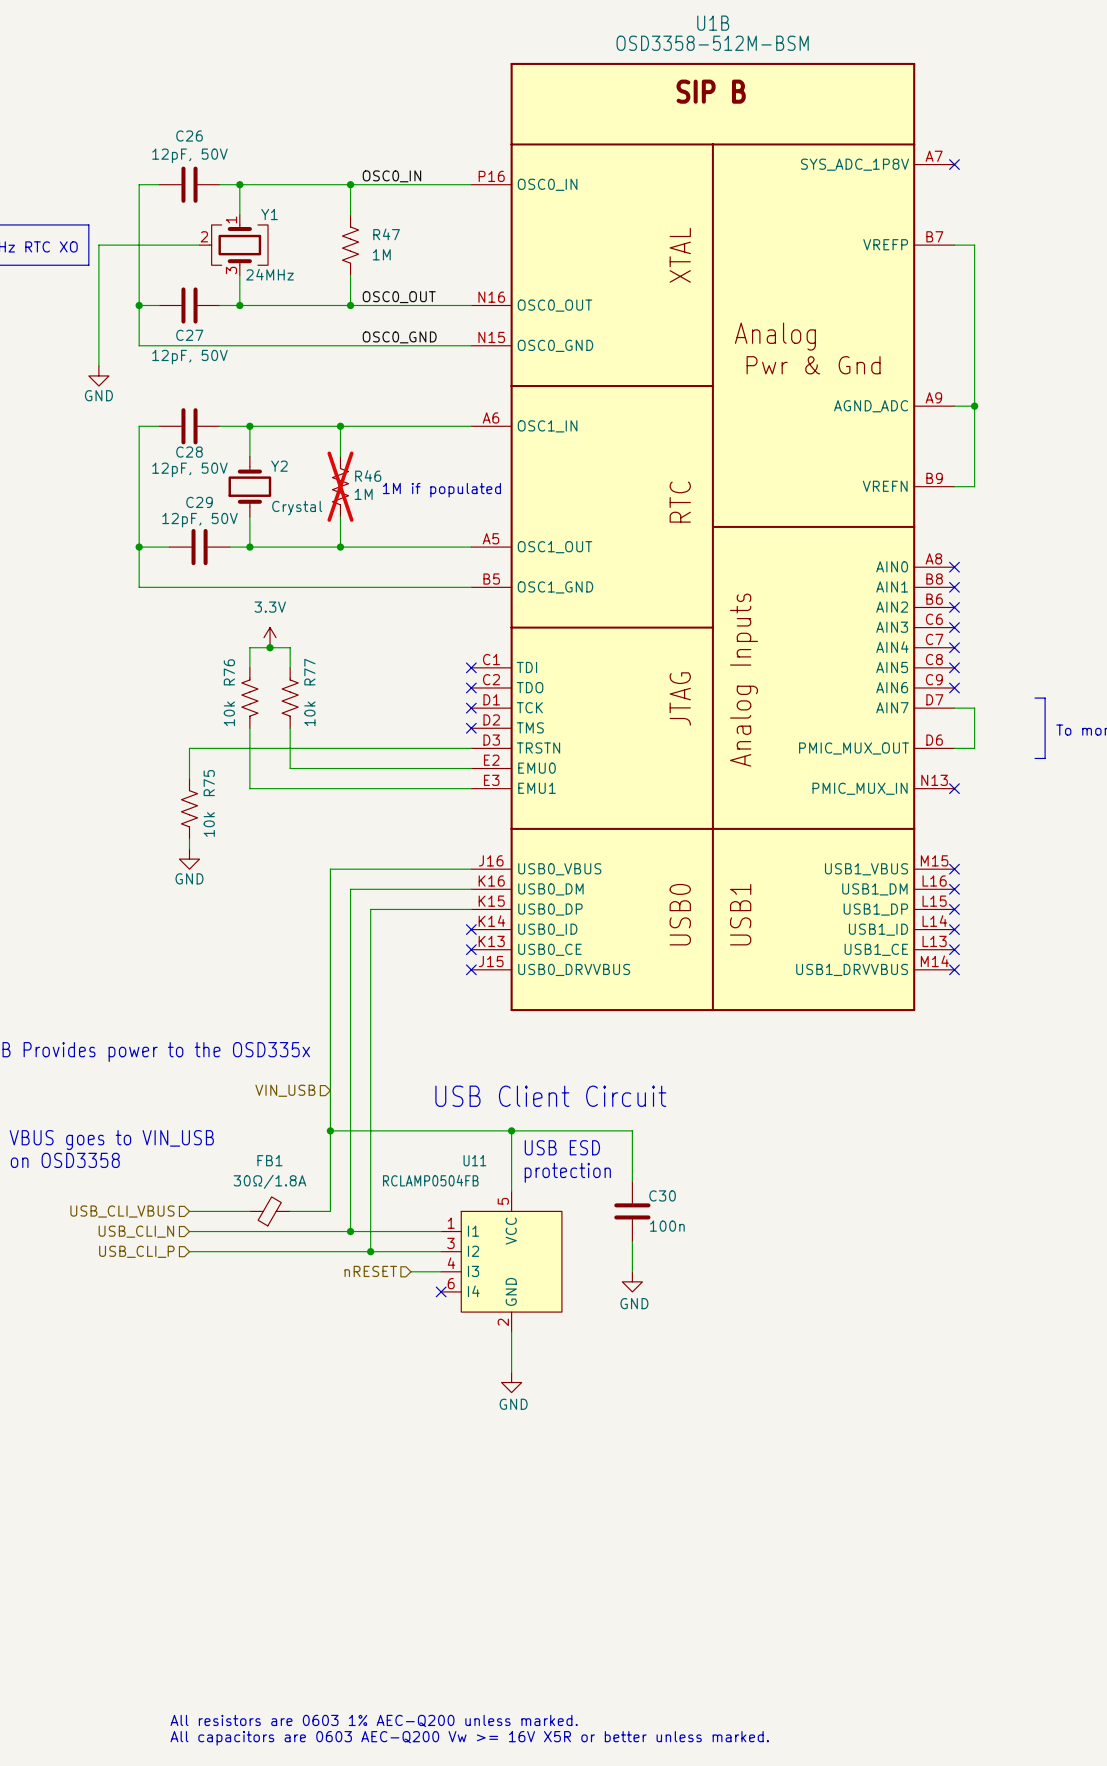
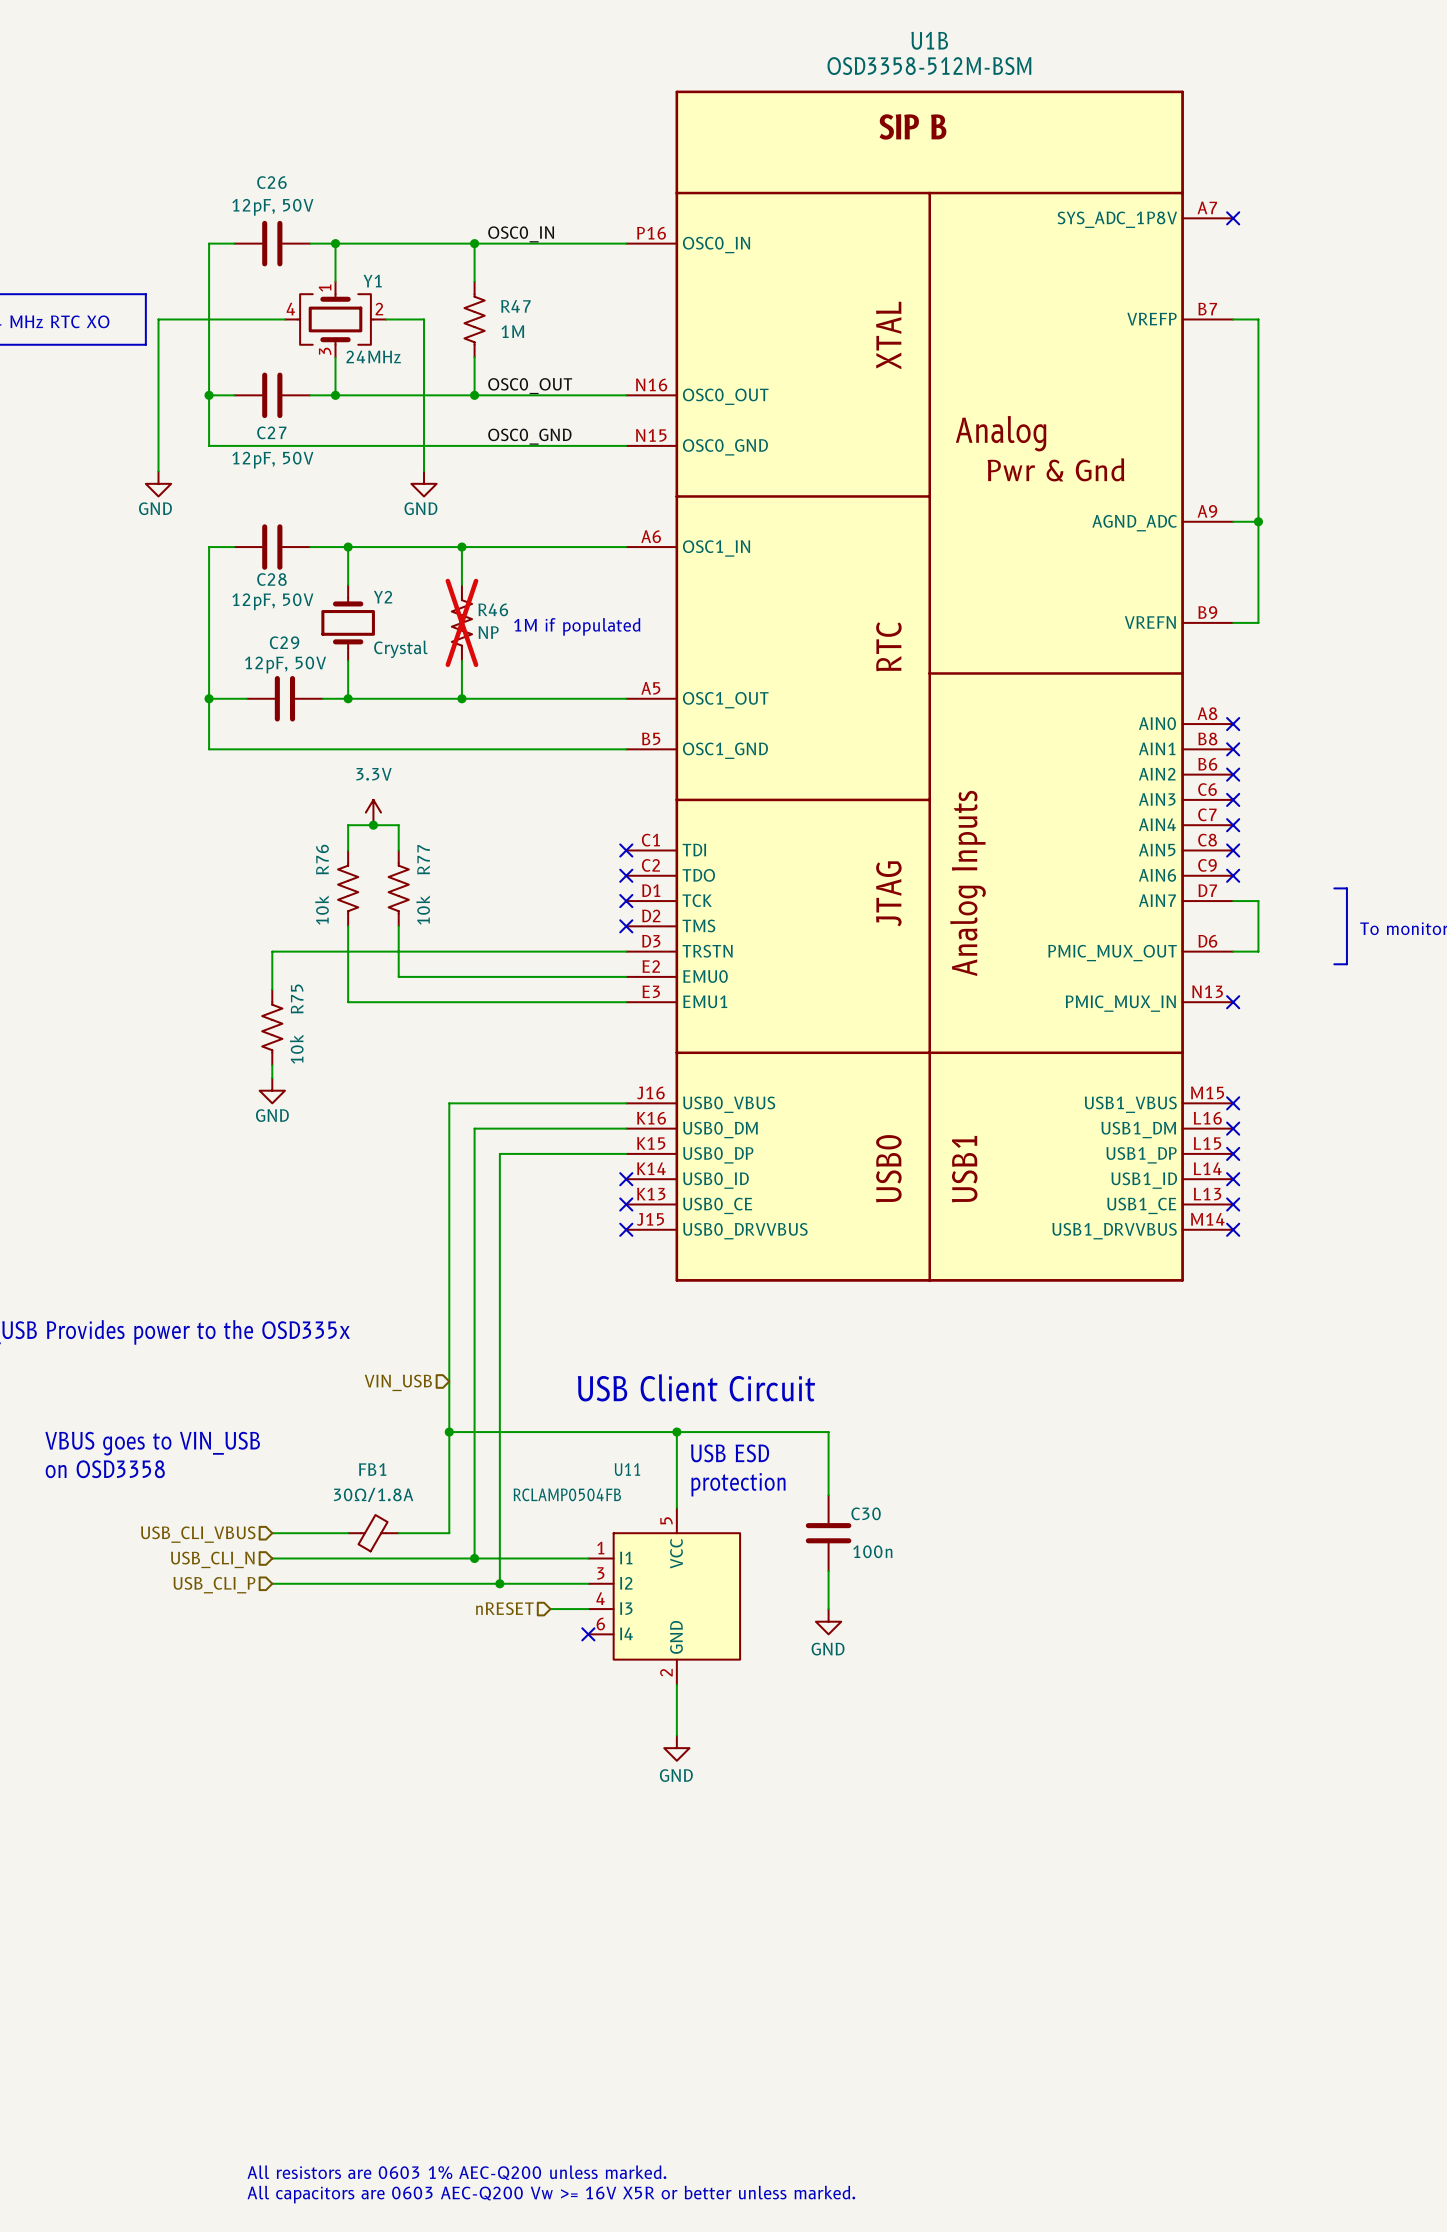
Y1 symbol: [199, 214, 269, 276] -> [284, 281, 387, 358]
wire: none -> (386, 319) (424, 319) (424, 471)
power symbol: none -> GND (424, 483)
R46 value: 1M (363, 494) -> NP (488, 632)

